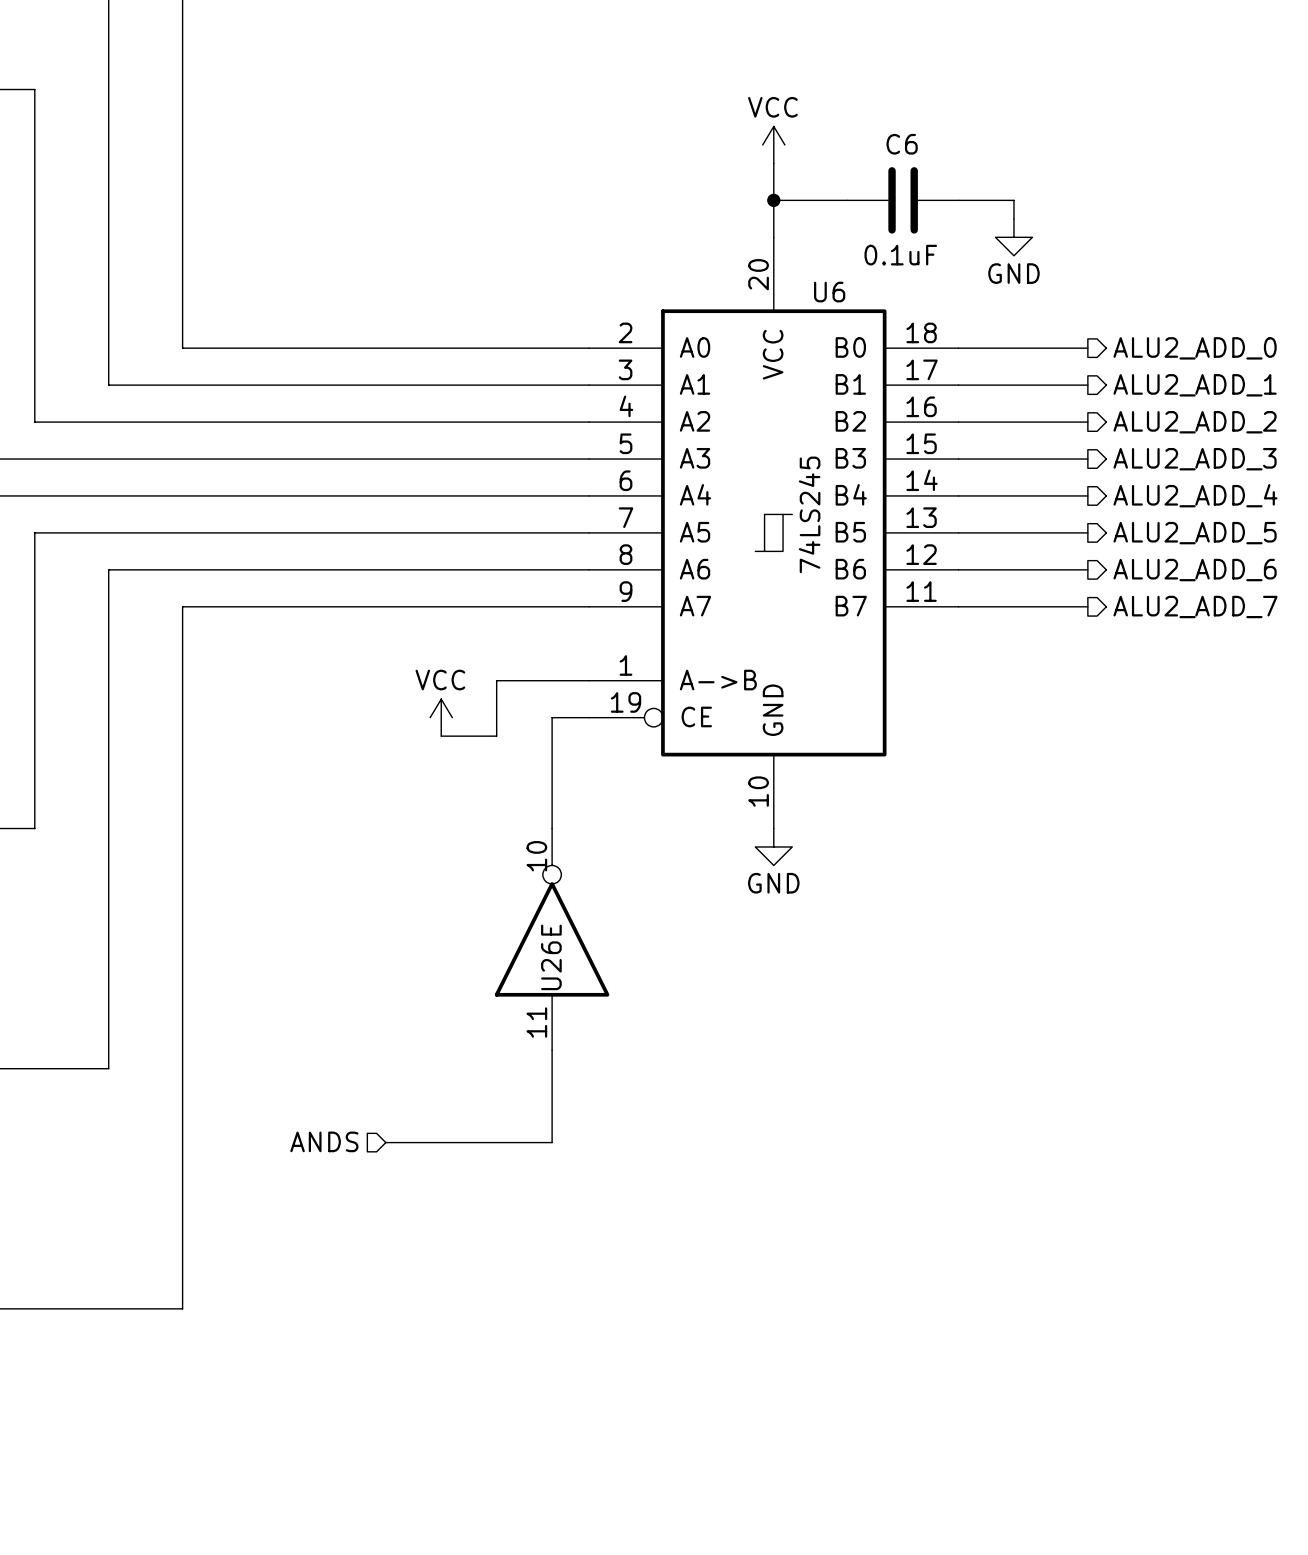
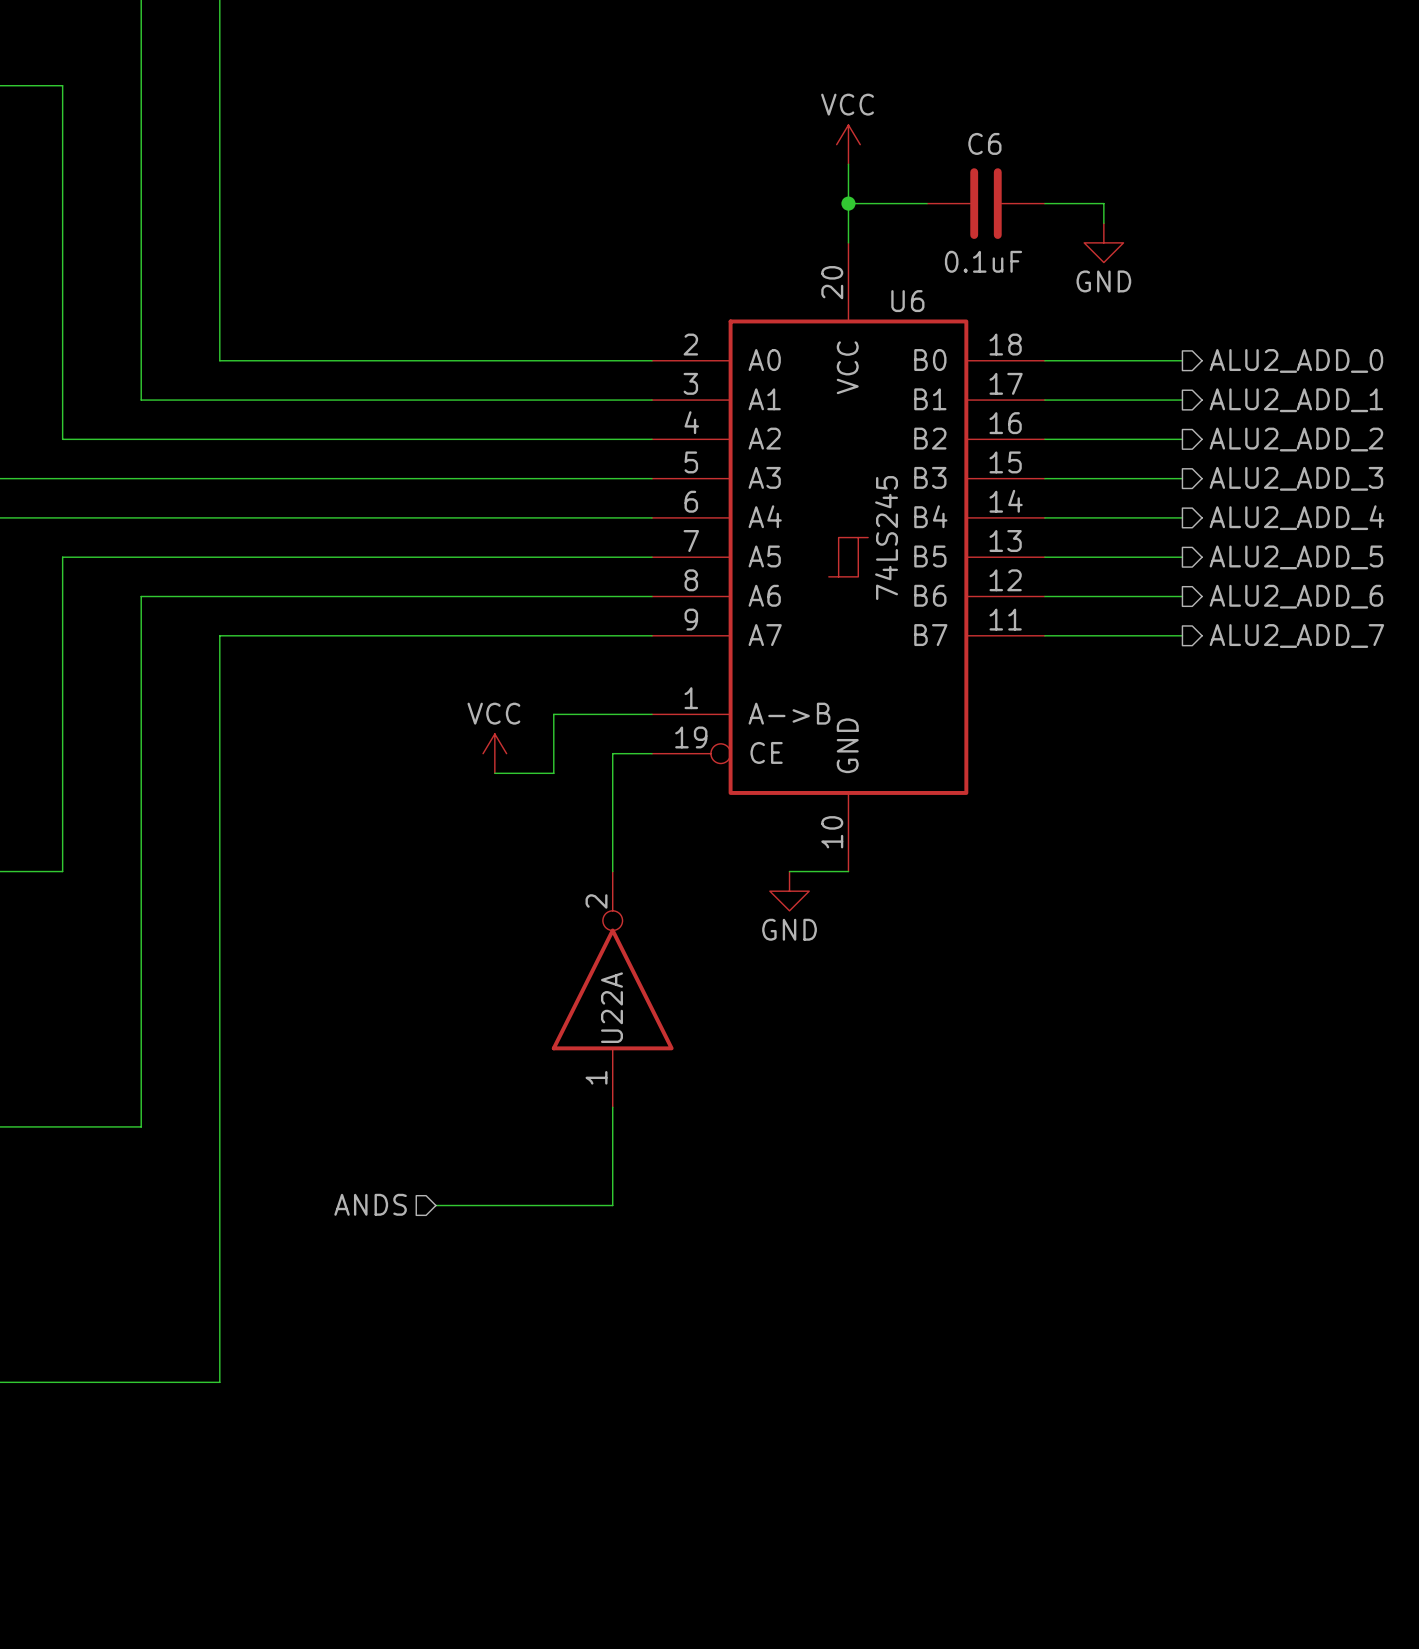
wire: none -> (789, 871) (848, 871)
power symbol position: GND (773, 846) -> GND (789, 891)
U26E pin number: 10 (536, 856) -> 2 (596, 901)
U26E name: U26E (551, 957) -> U22A (611, 1007)
U26E pin number: 11 (536, 1022) -> 1 (596, 1077)

